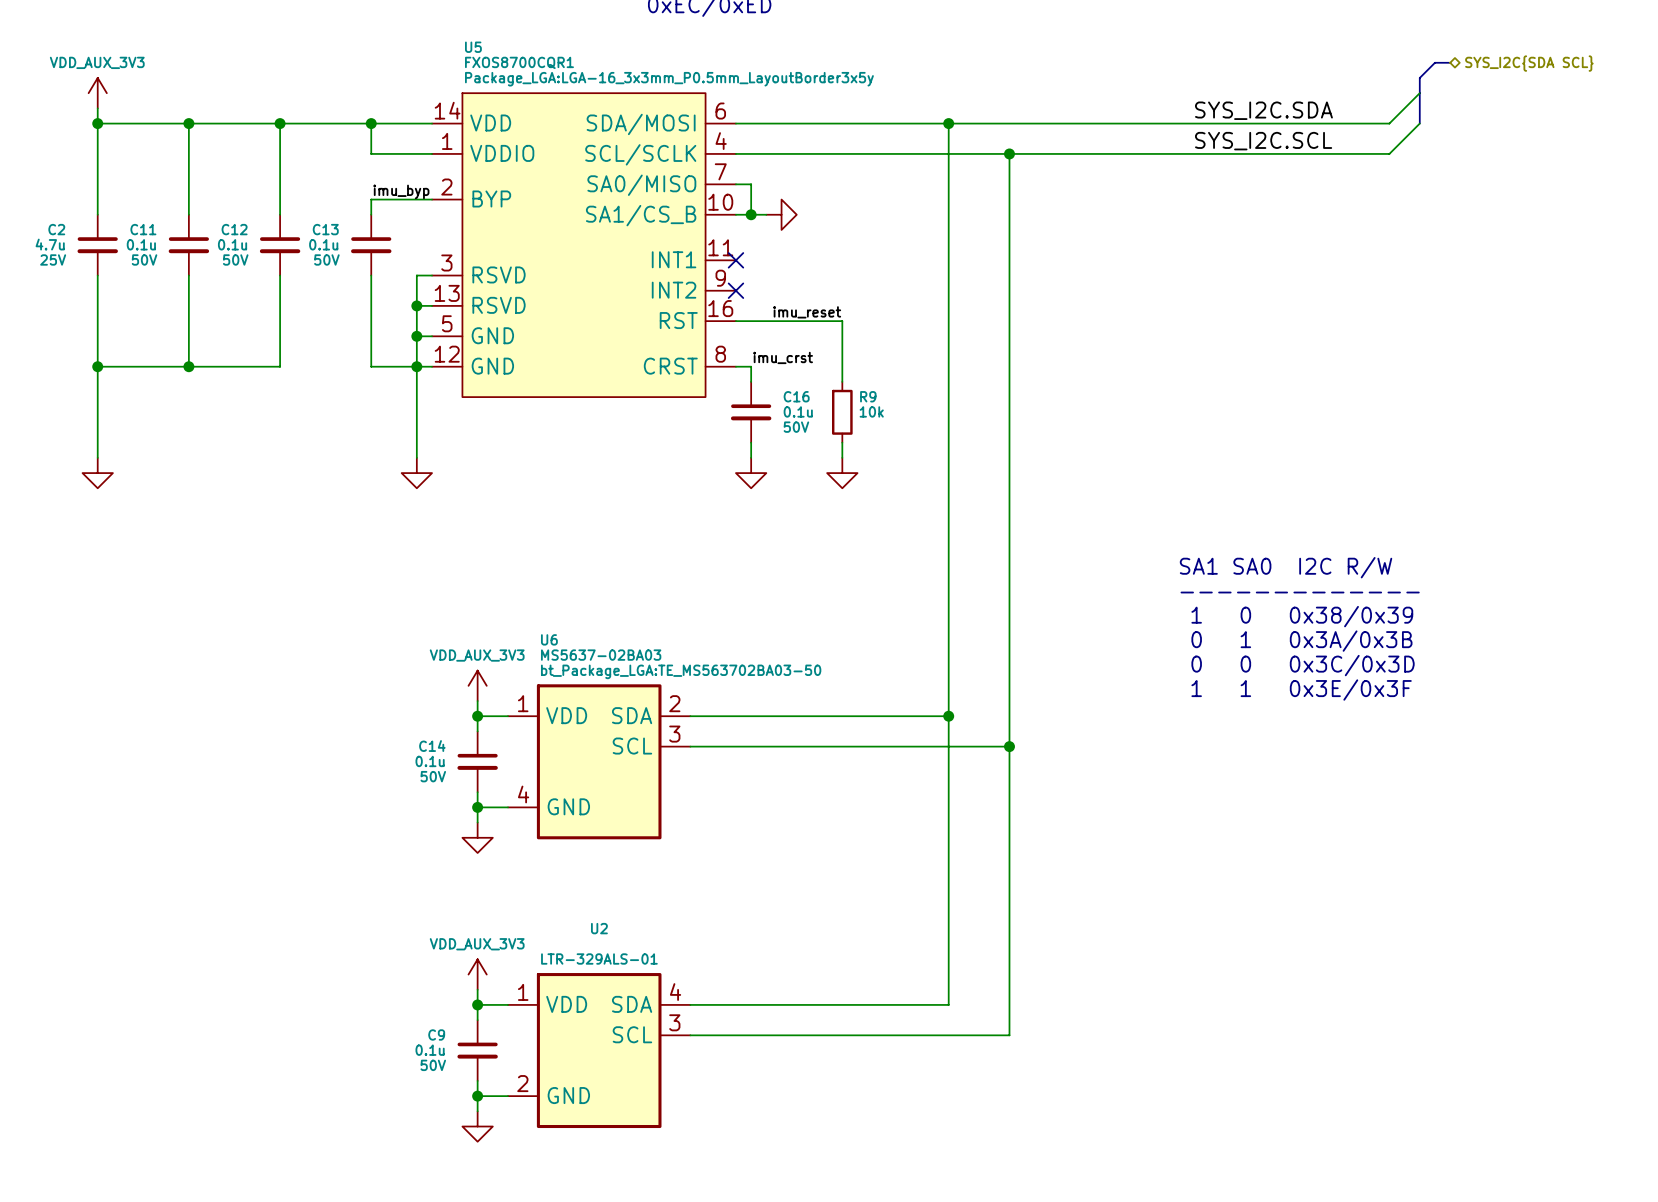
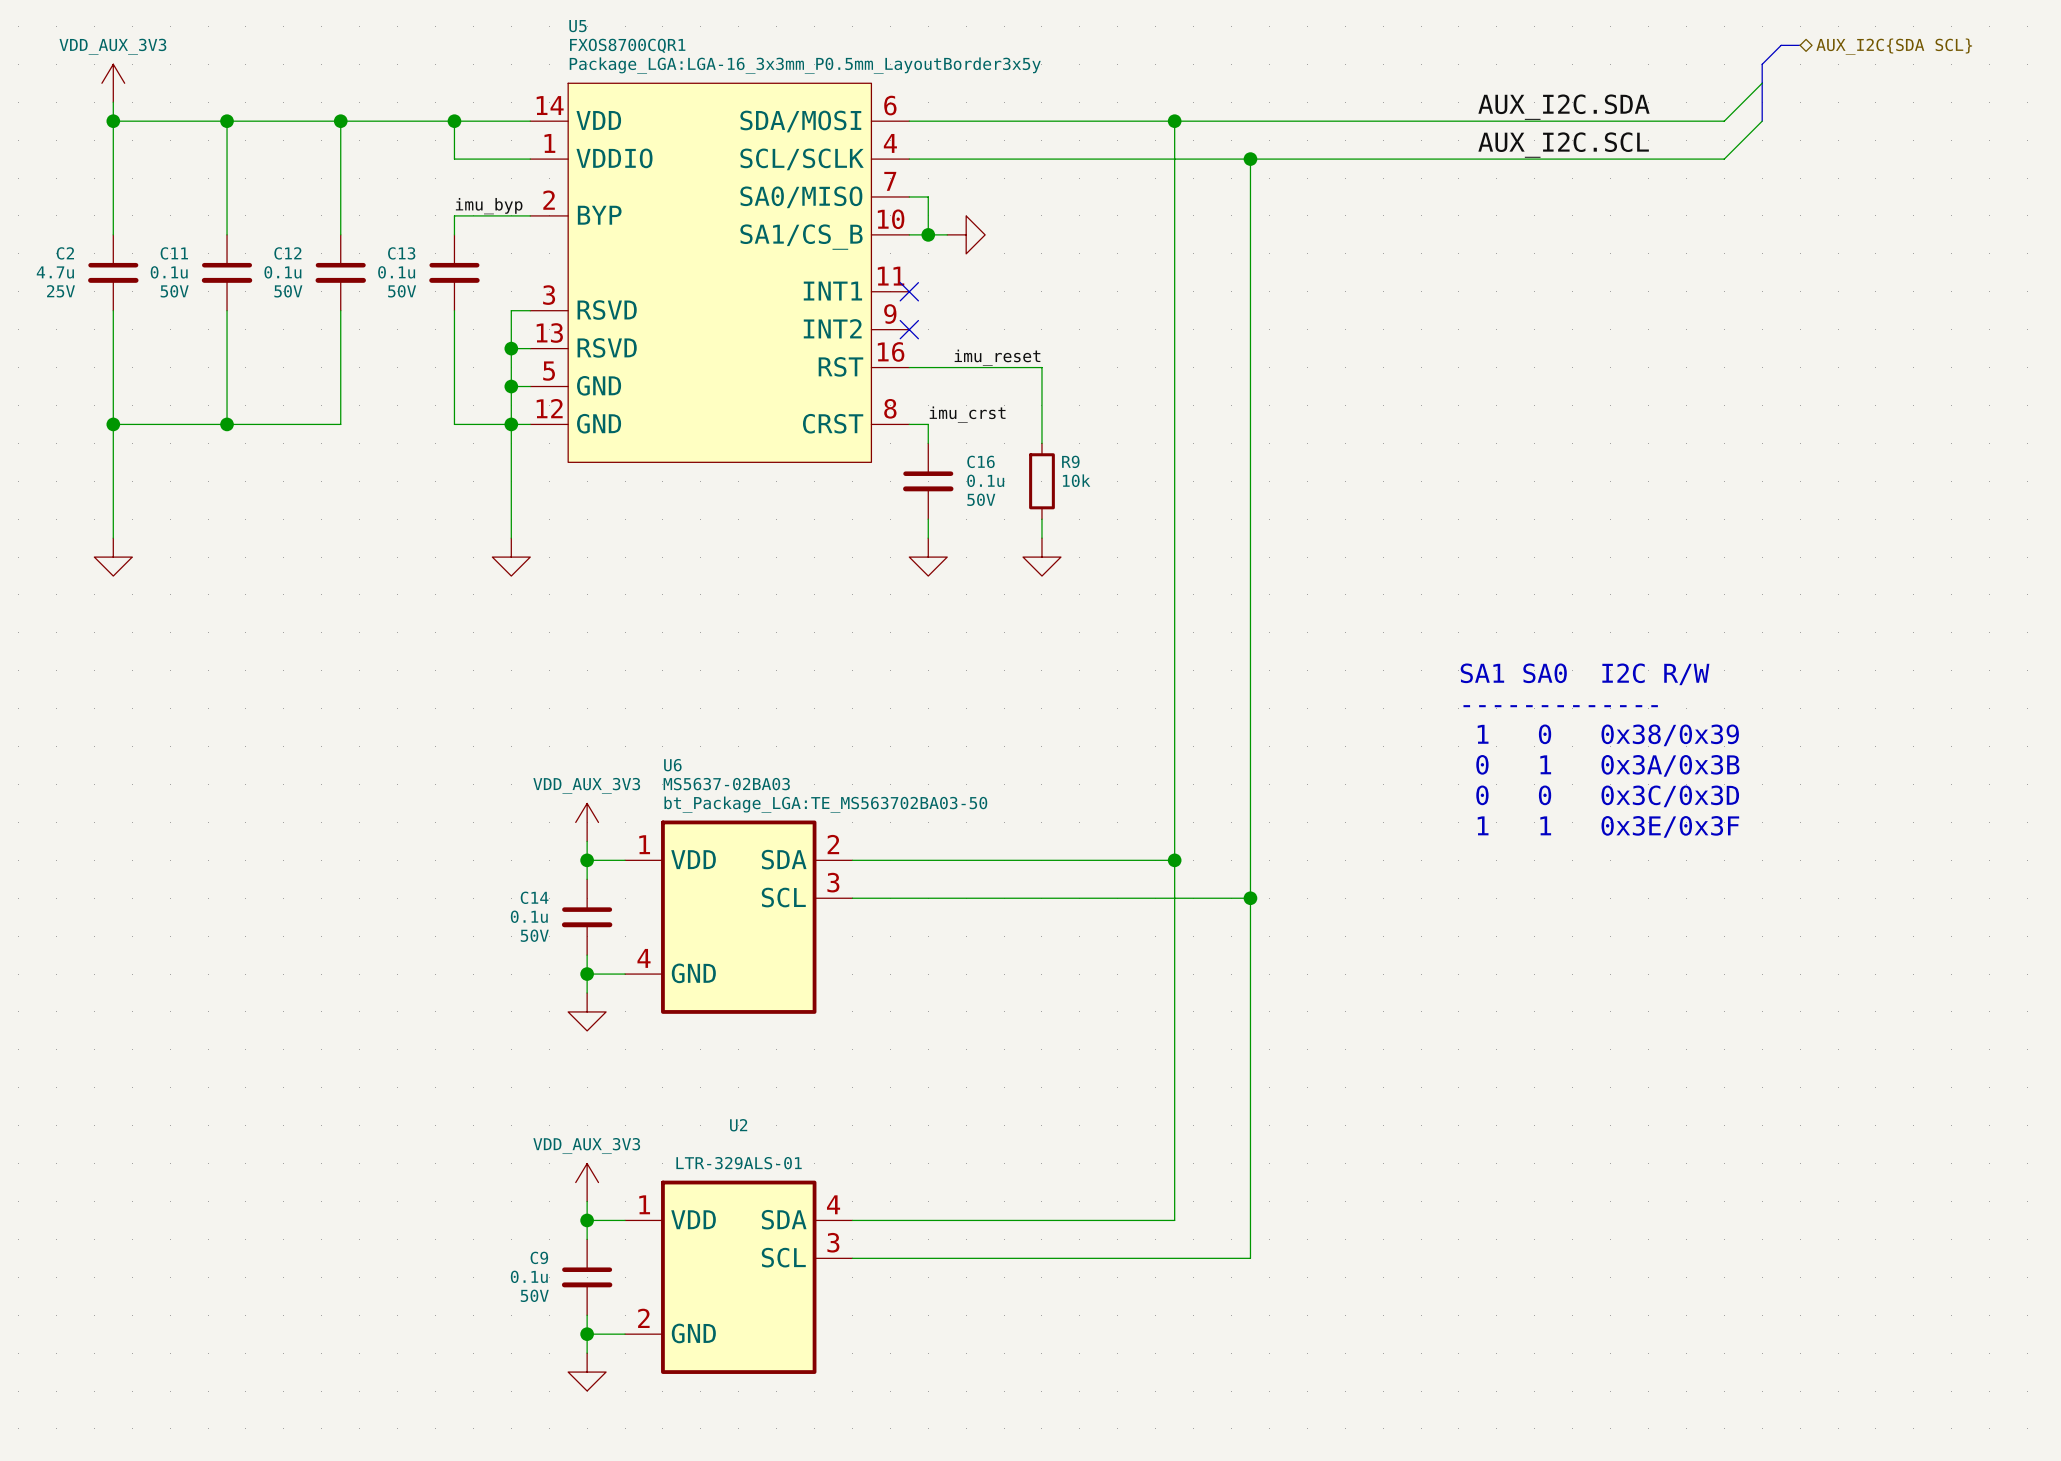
hierarchical label: SYS_I2C{SDA SCL} (1529, 63) -> AUX_I2C{SDA SCL} (1894, 46)
label: SYS_I2C.SDA (1263, 110) -> AUX_I2C.SDA (1563, 107)
label: SYS_I2C.SCL (1263, 141) -> AUX_I2C.SCL (1563, 145)

